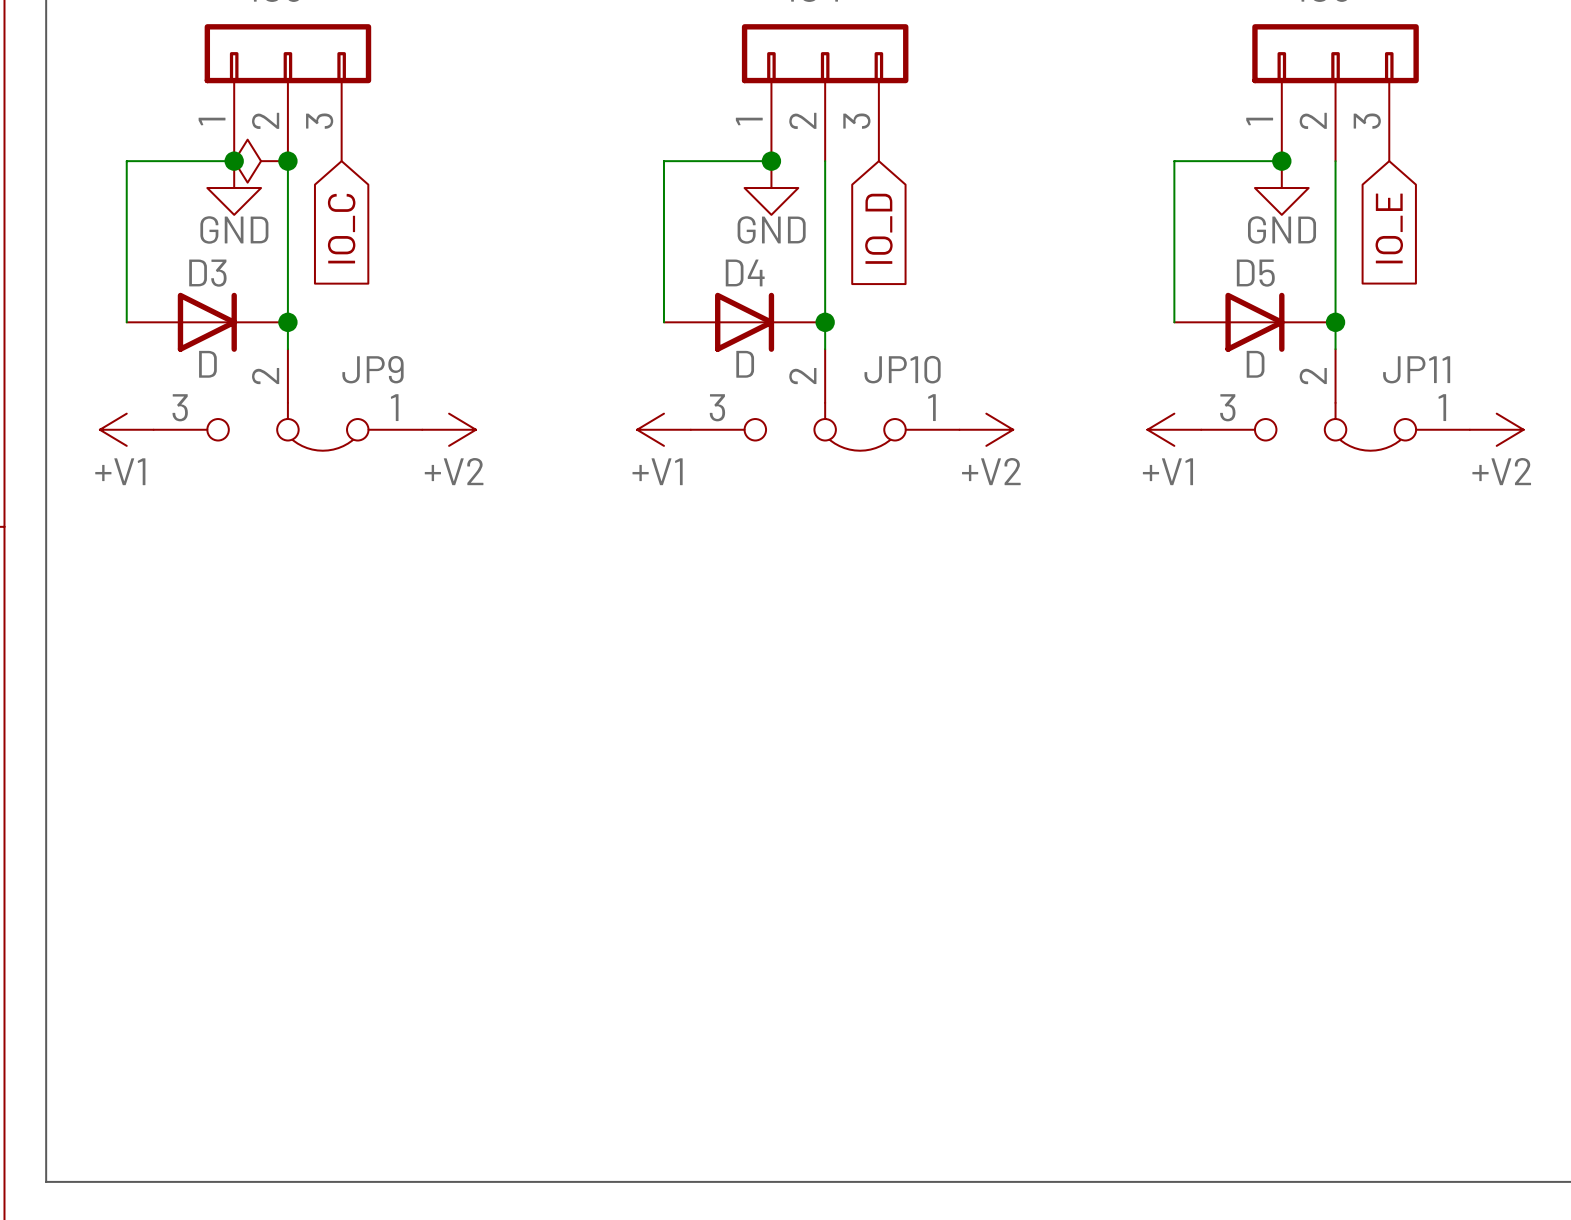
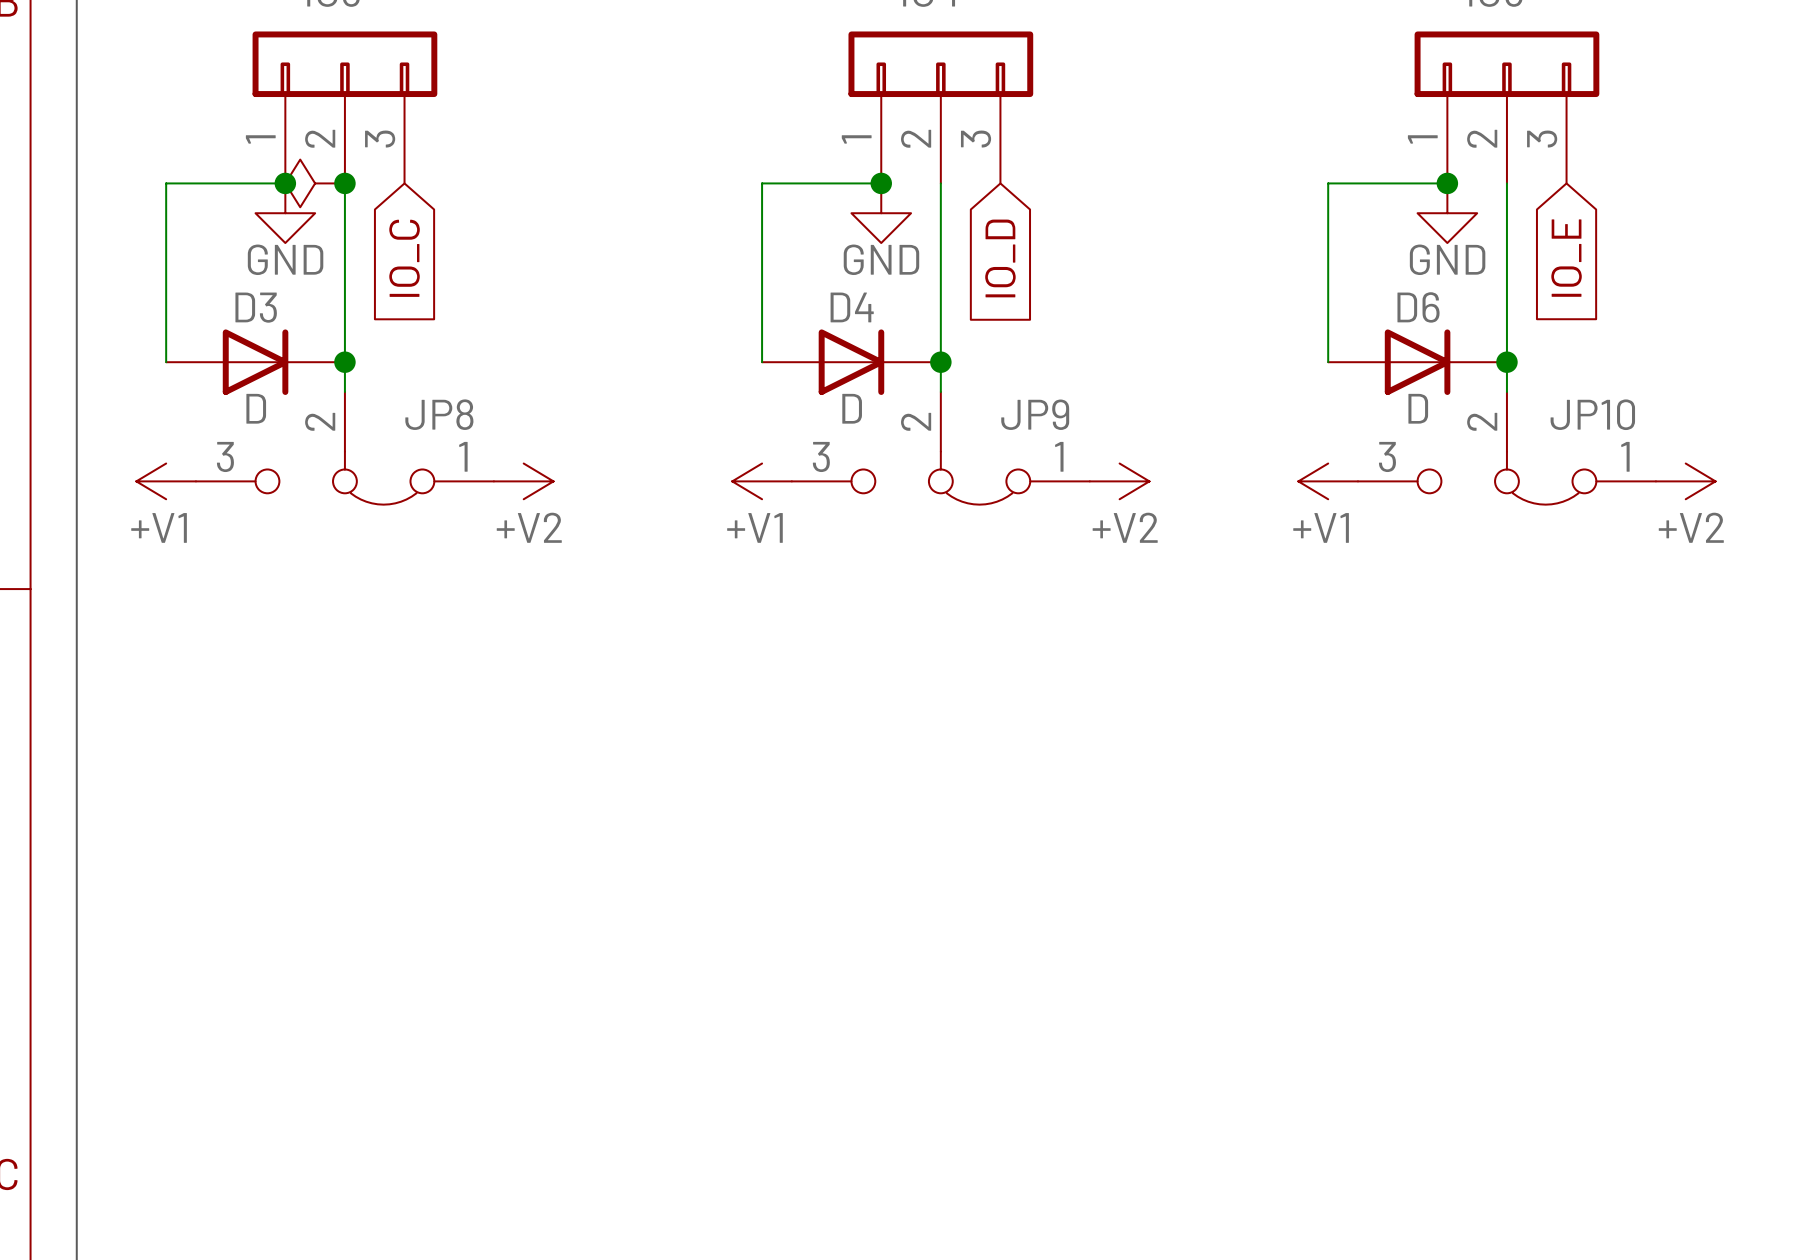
D5 name: D5 (1255, 273) -> D6 (1418, 307)
JP9 name: JP9 (372, 369) -> JP8 (439, 414)
JP10 name: JP10 (902, 369) -> JP9 (1035, 414)
JP11 name: JP11 (1416, 369) -> JP10 (1592, 414)

